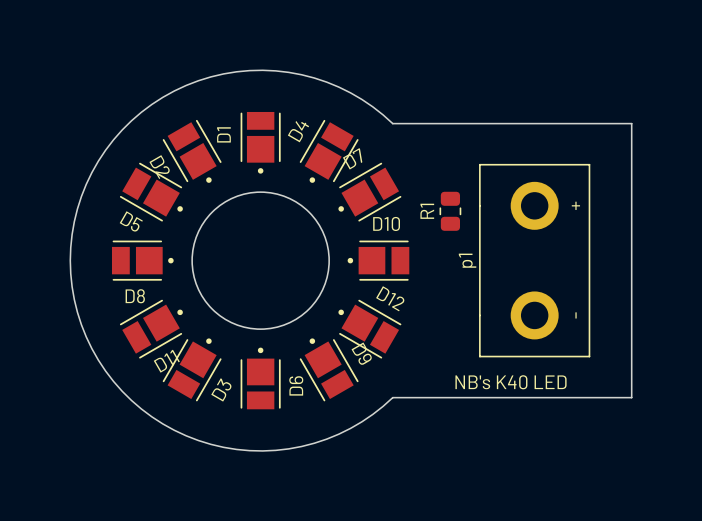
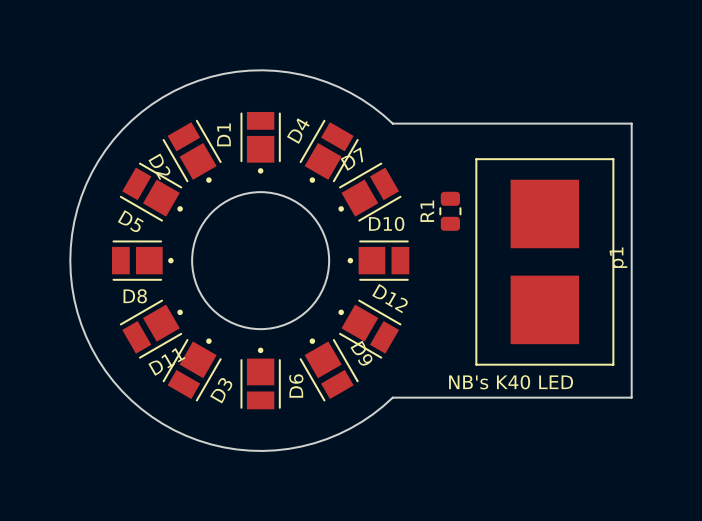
p1 footprint: [479, 163, 591, 358] -> [475, 158, 615, 366]
p1 name position: p1 (467, 260) -> p1 (618, 257)

